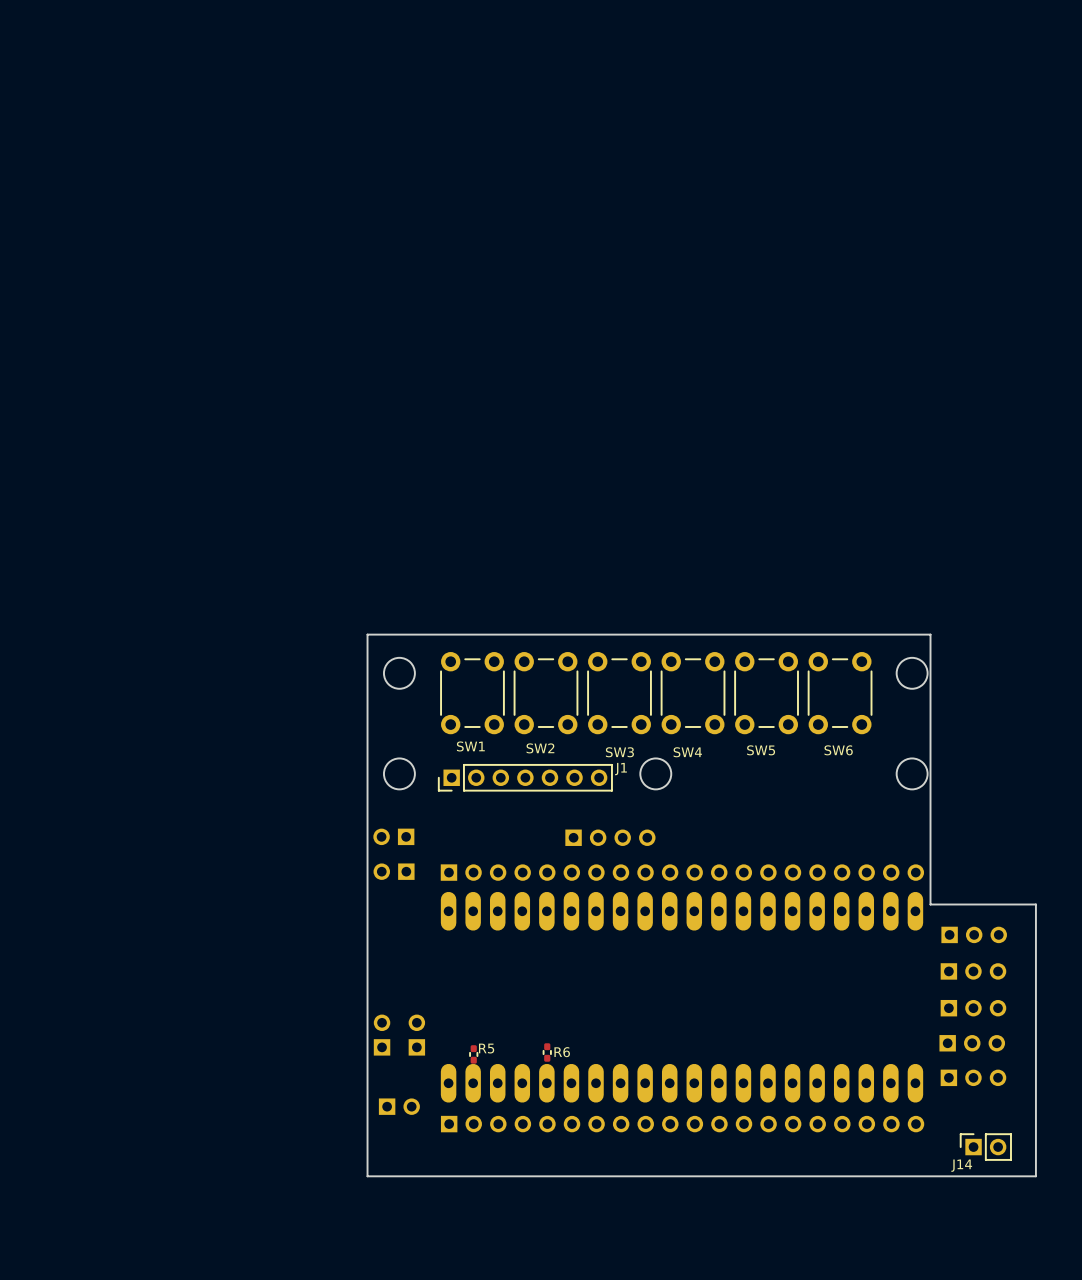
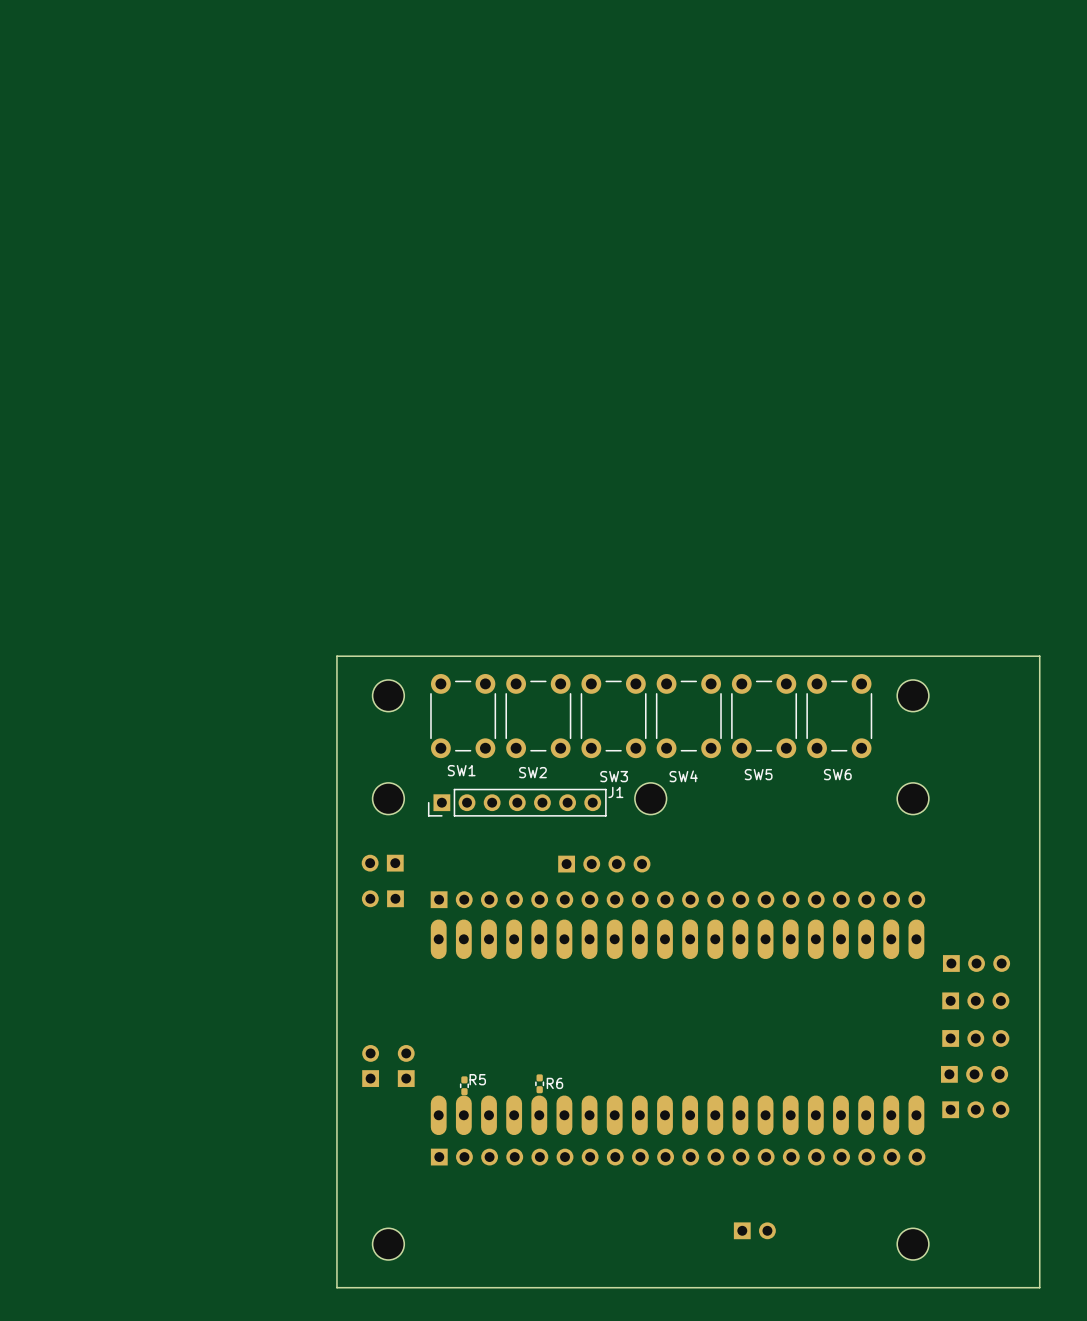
board edge: (367, 634) (367, 1176) (1035, 1176) -> (355, 656) (336, 656) (336, 1287) (1039, 1287) (1039, 1210)
board edge: (930, 634) (930, 904) (1035, 904) -> (931, 656) (1039, 656) (1039, 932)
part: (399, 1106) -> none
J14: (985, 1147) -> none
part: none -> (754, 1230)
part: none -> (388, 1244)
part: none -> (913, 1244)

